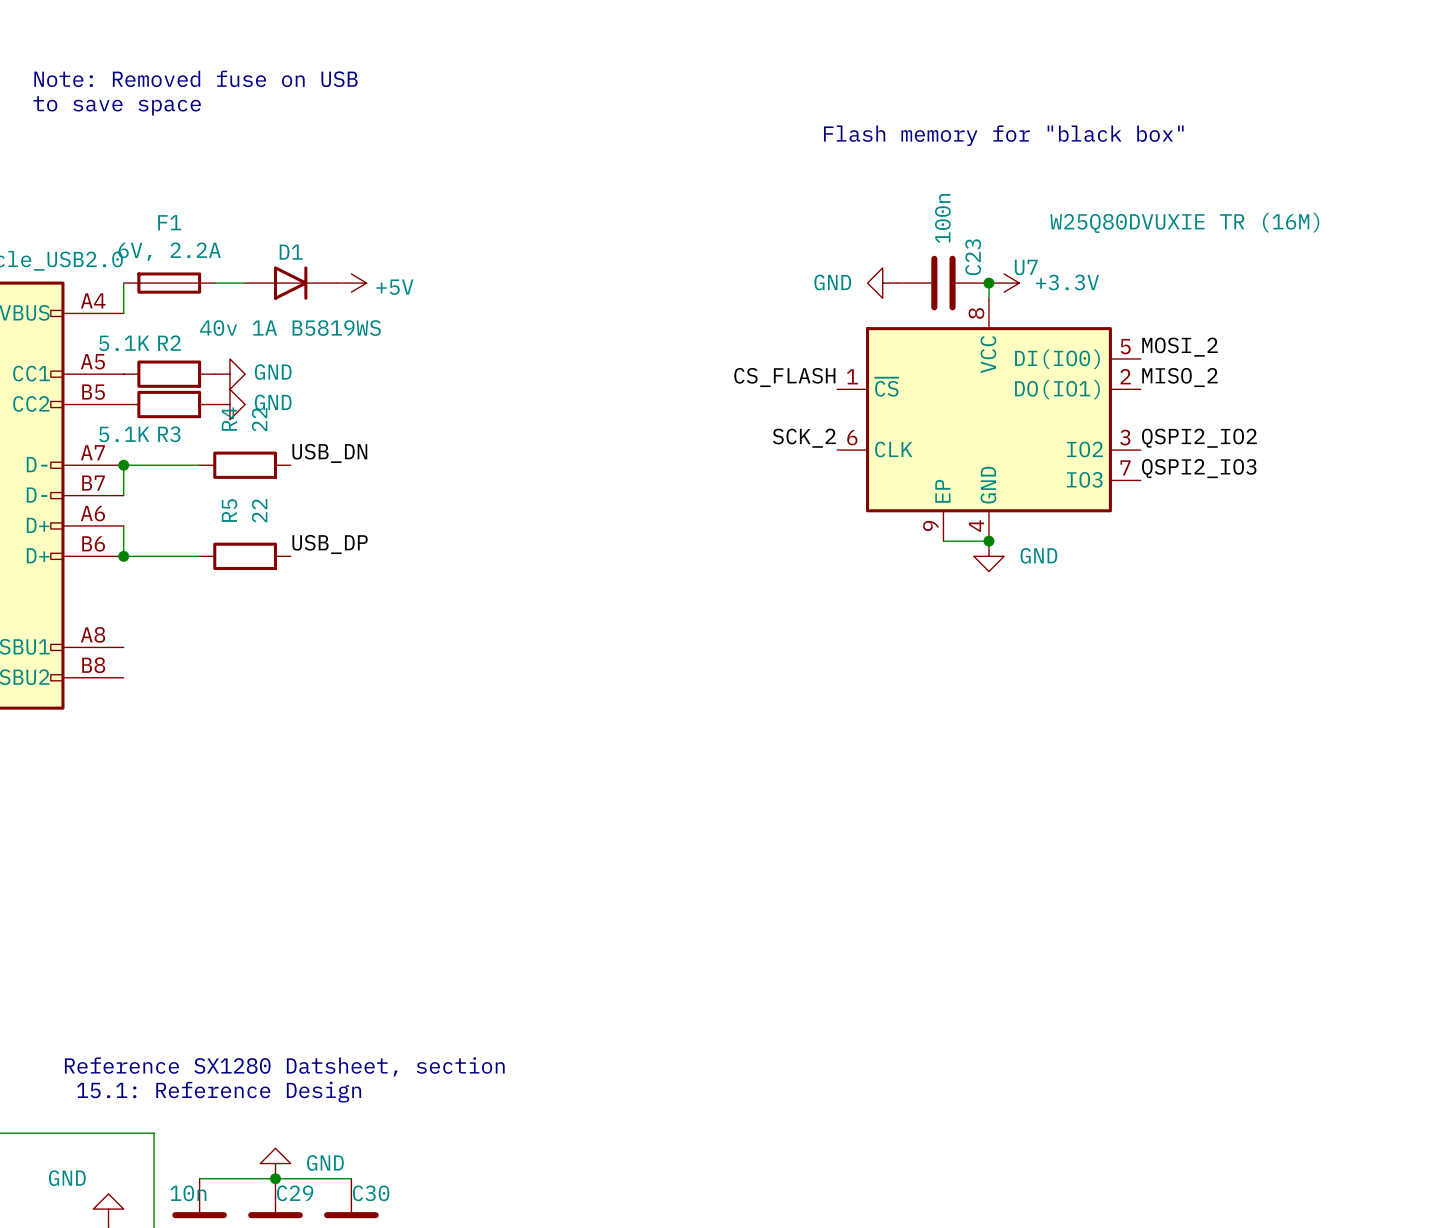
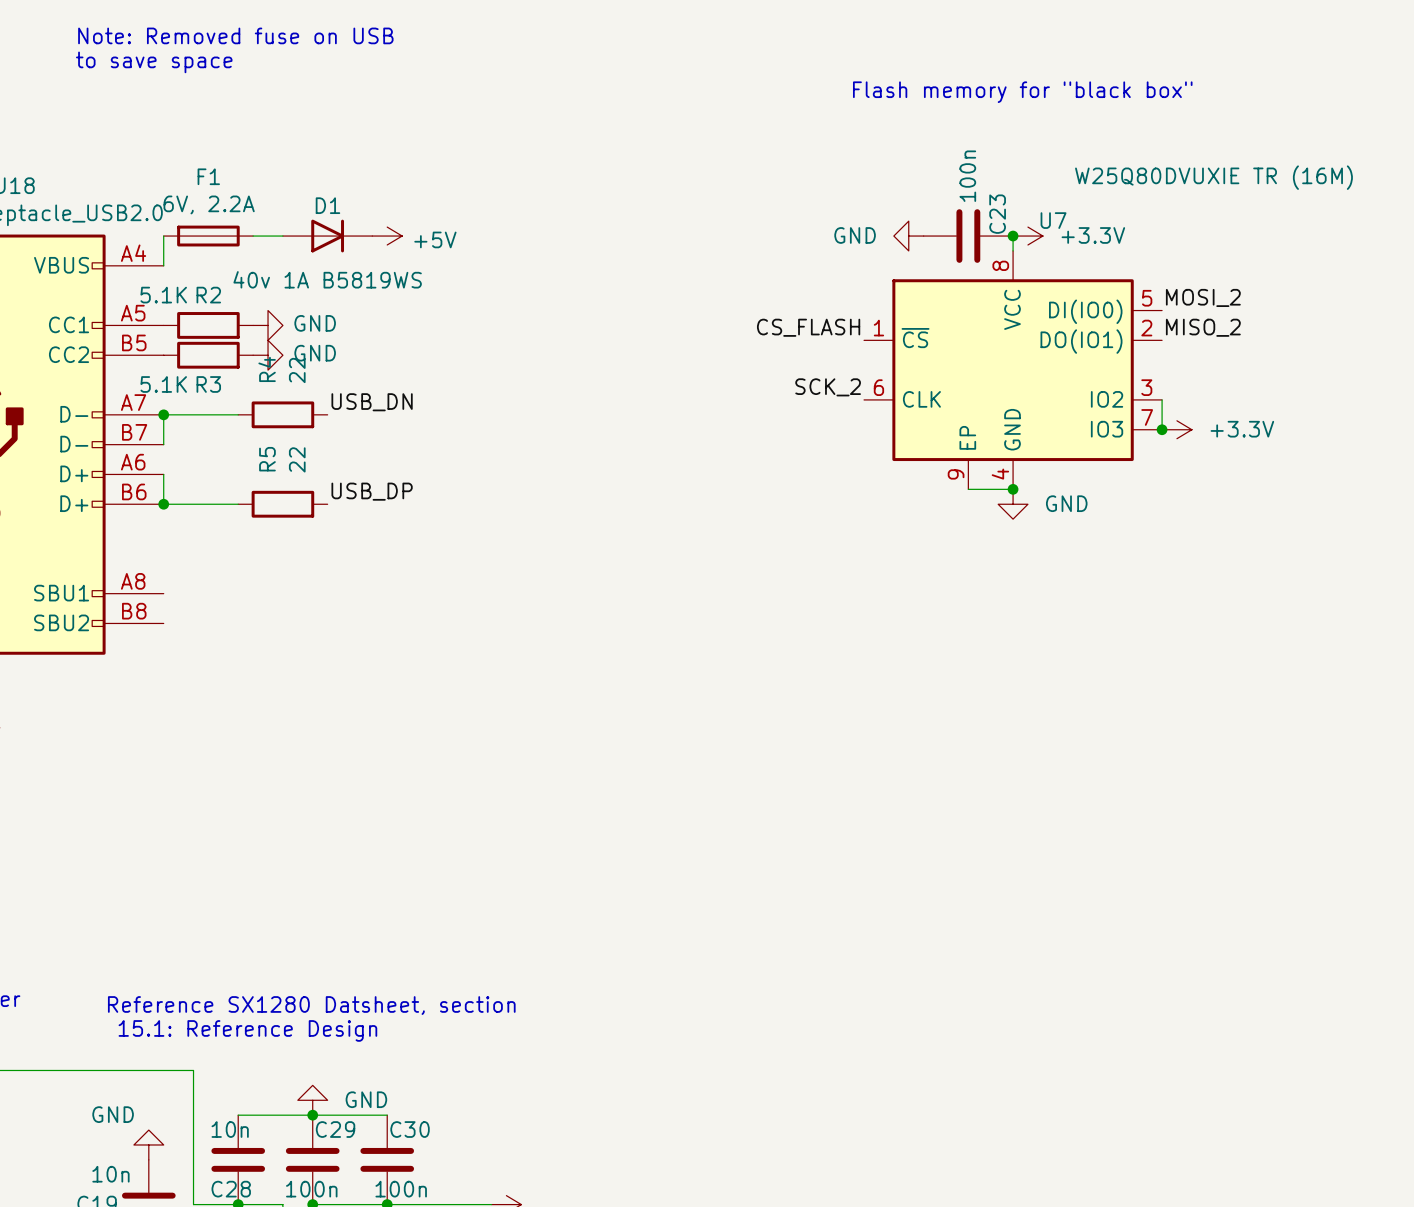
label: QSPI2_IO2 (1199, 438) -> none
wire: none -> (1162, 399) (1162, 429)
label: QSPI2_IO3 (1199, 468) -> none
junction: none -> (1162, 429)
power symbol: none -> +3.3V (1176, 429)

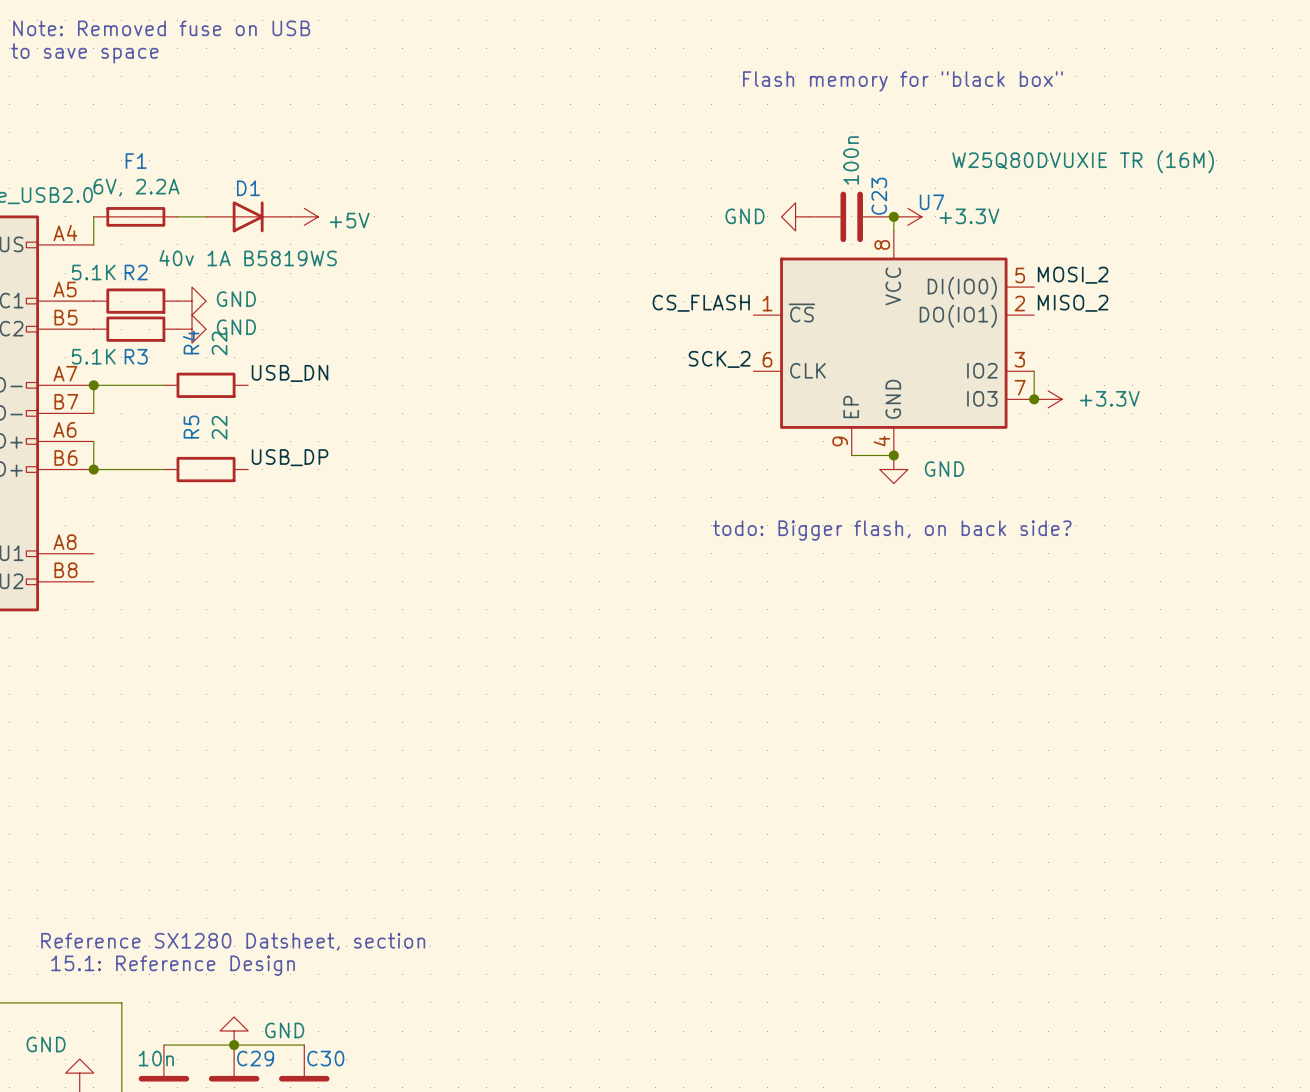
text: none -> todo: Bigger flash, on back side? (892, 530)

